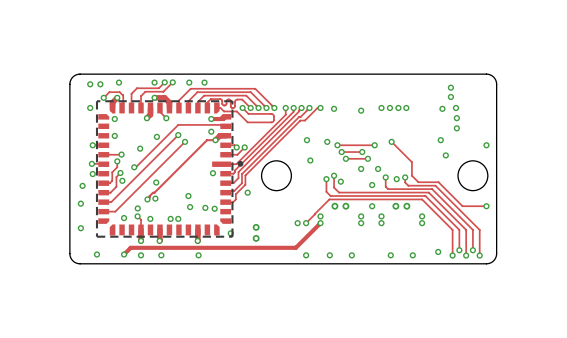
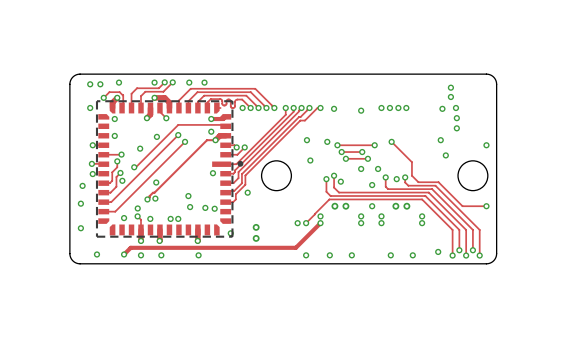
track: (220, 108) (224, 111) (236, 111) (247, 122) (273, 120) (272, 114) (248, 113) (242, 108) -> none

